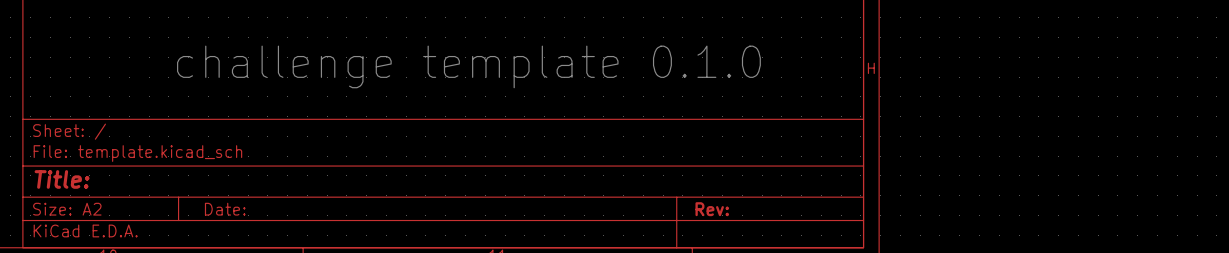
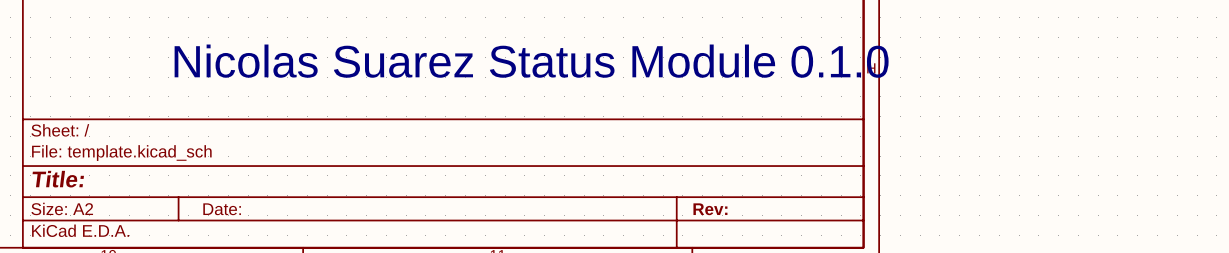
text: challenge template 0.1.0 (468, 66) -> Nicolas Suarez Status Module 0.1.0 (531, 61)

